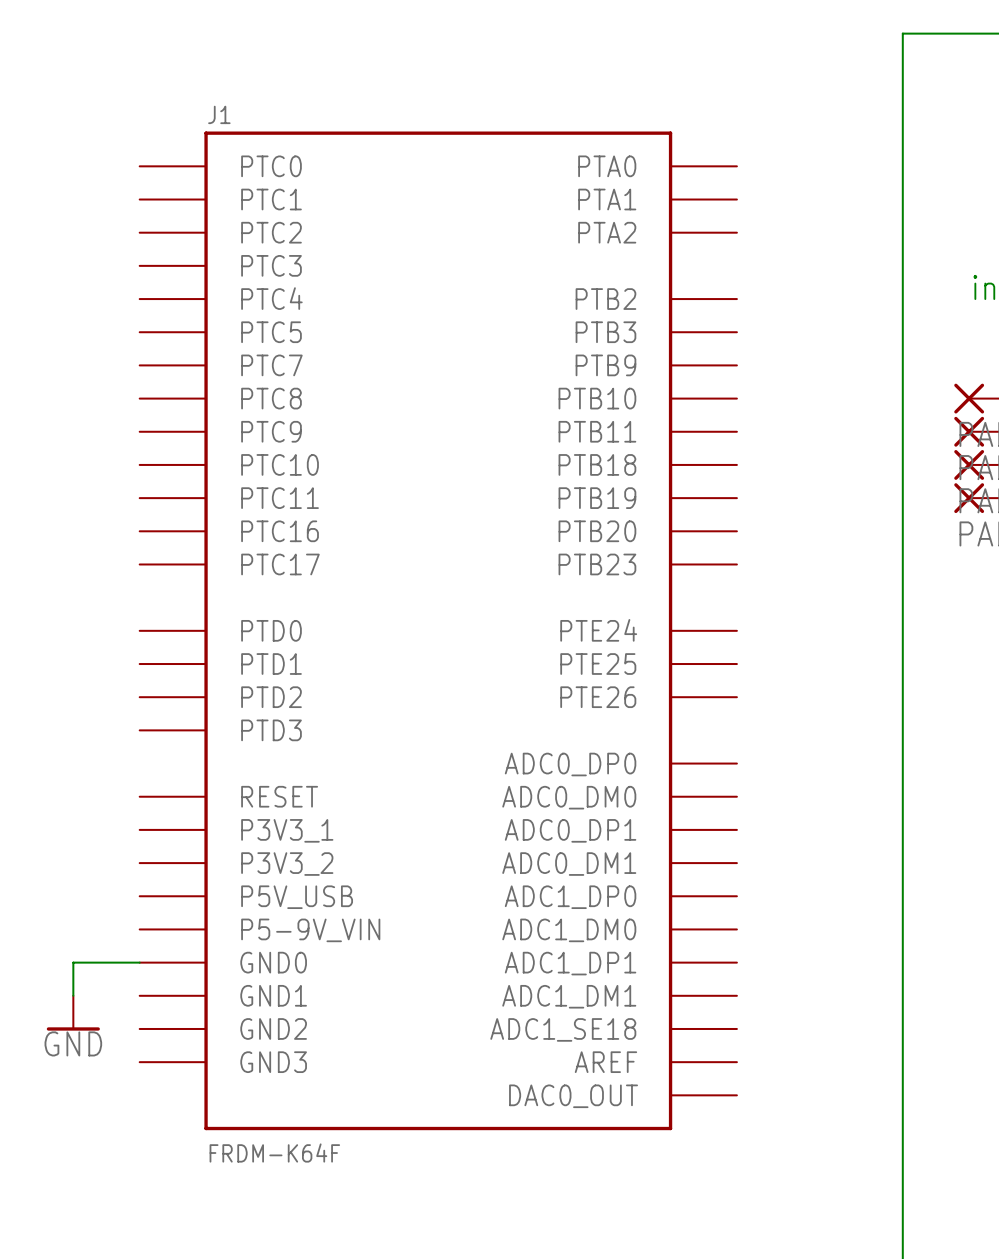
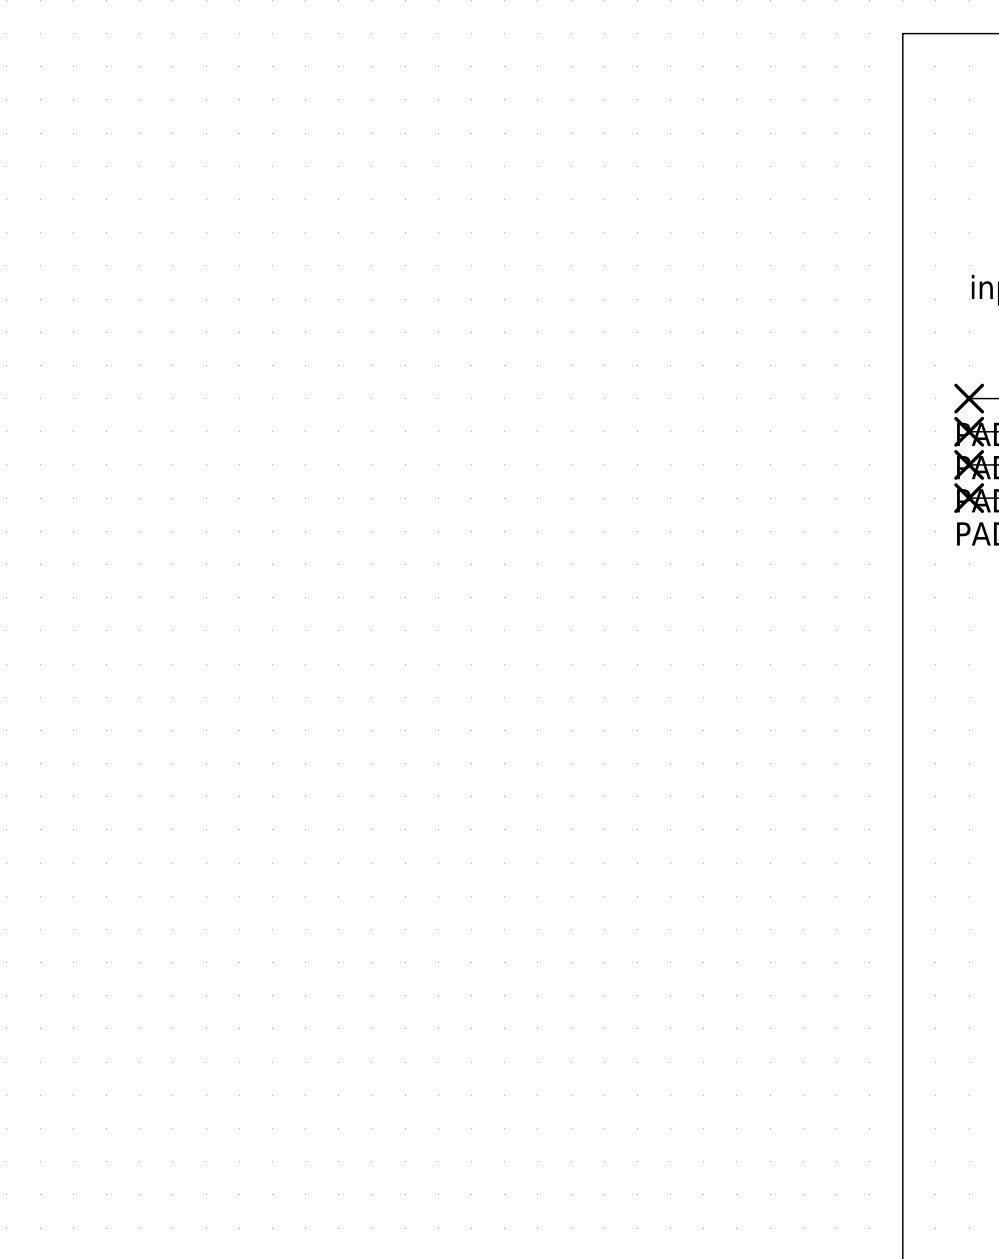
J1: FRDM-K64F (438, 630) -> none
wire: (139, 962) (73, 962) (73, 995) -> none
power symbol: GND (73, 1013) -> none

